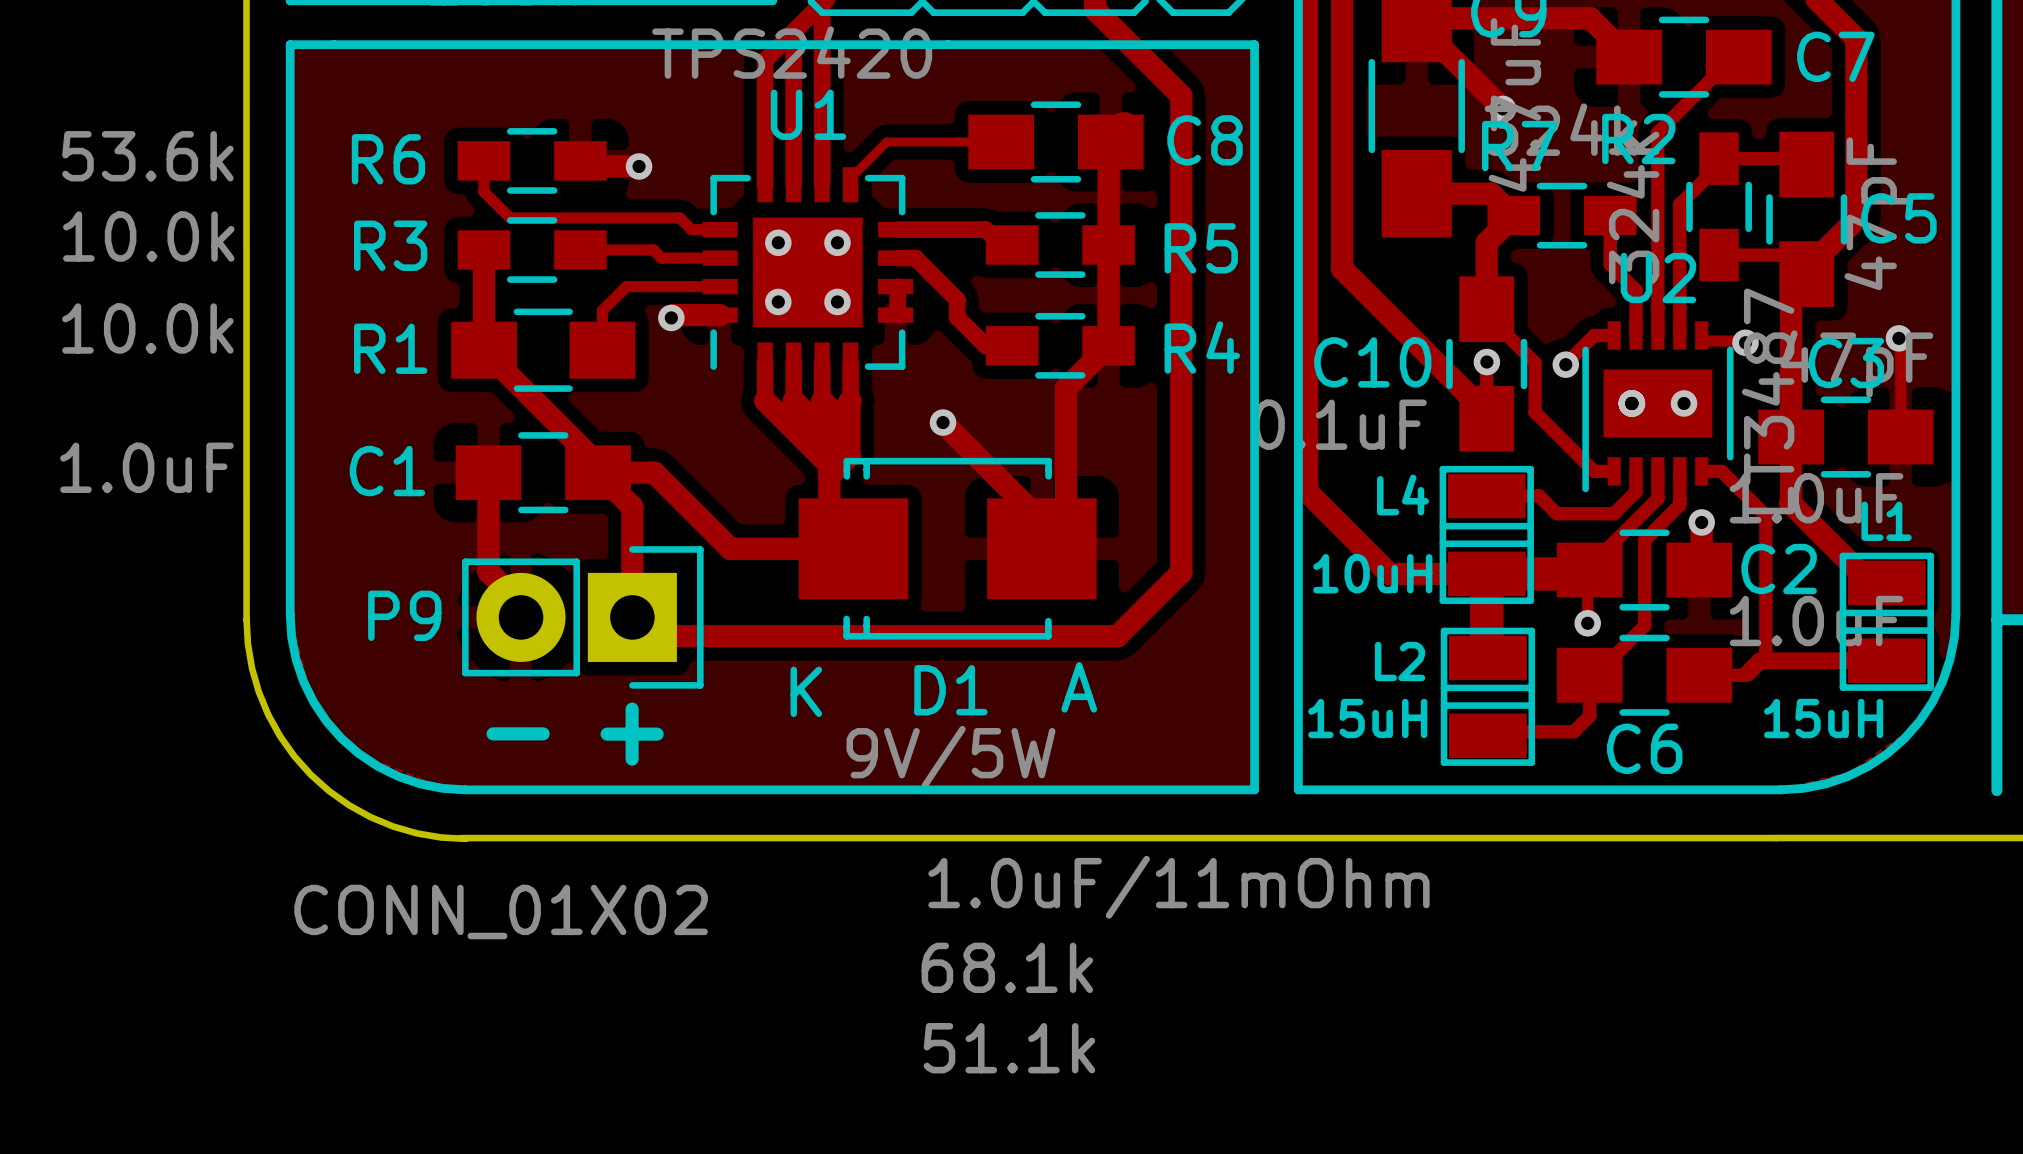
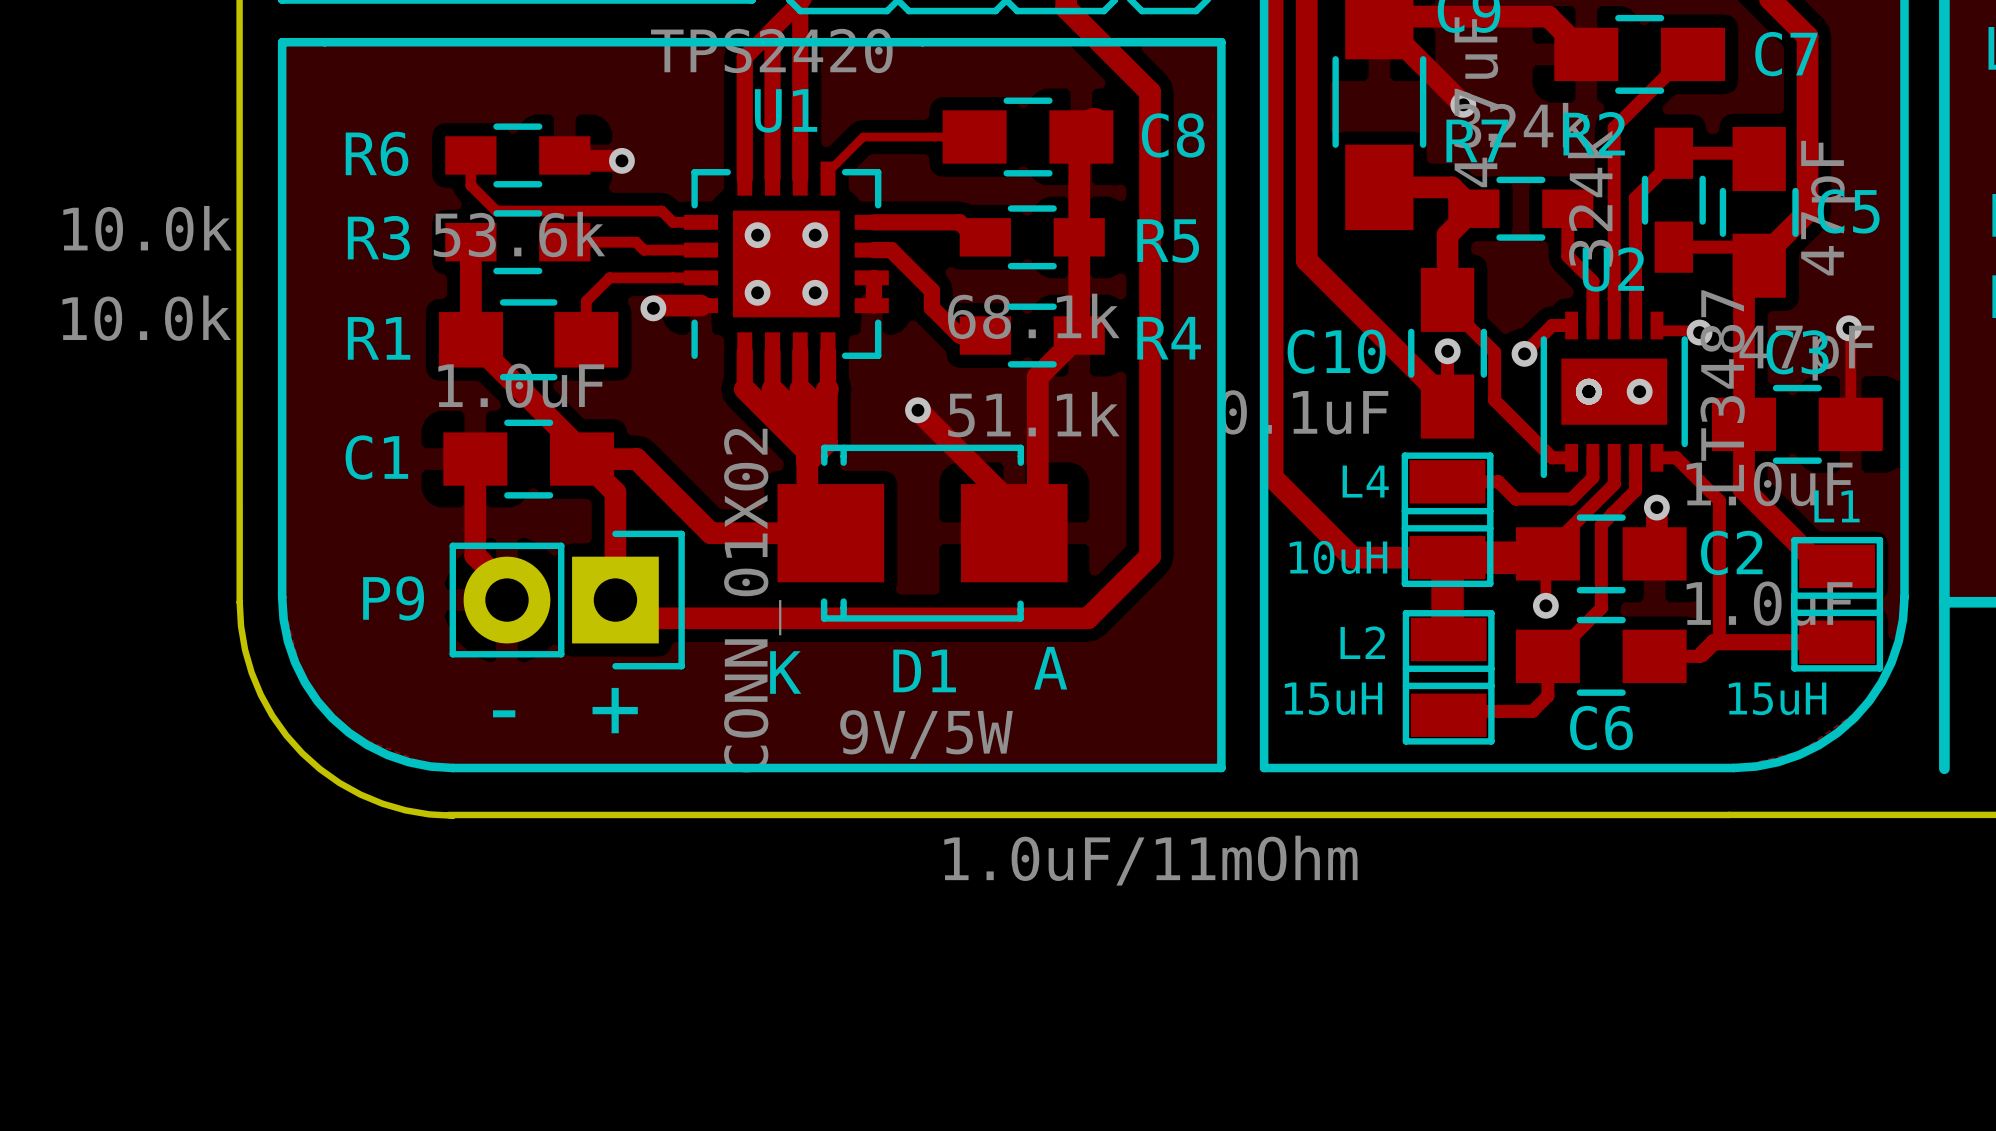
R6 value position: 53.6k (147, 156) -> 53.6k (519, 234)
C1 value position: 1.0uF (146, 467) -> 1.0uF (521, 385)
P9 value rotation: 0° (501, 912) -> 90° counterclockwise (752, 600)
R5 value position: 68.1k (1007, 967) -> 68.1k (1033, 316)
R4 value position: 51.1k (1009, 1048) -> 51.1k (1033, 414)

